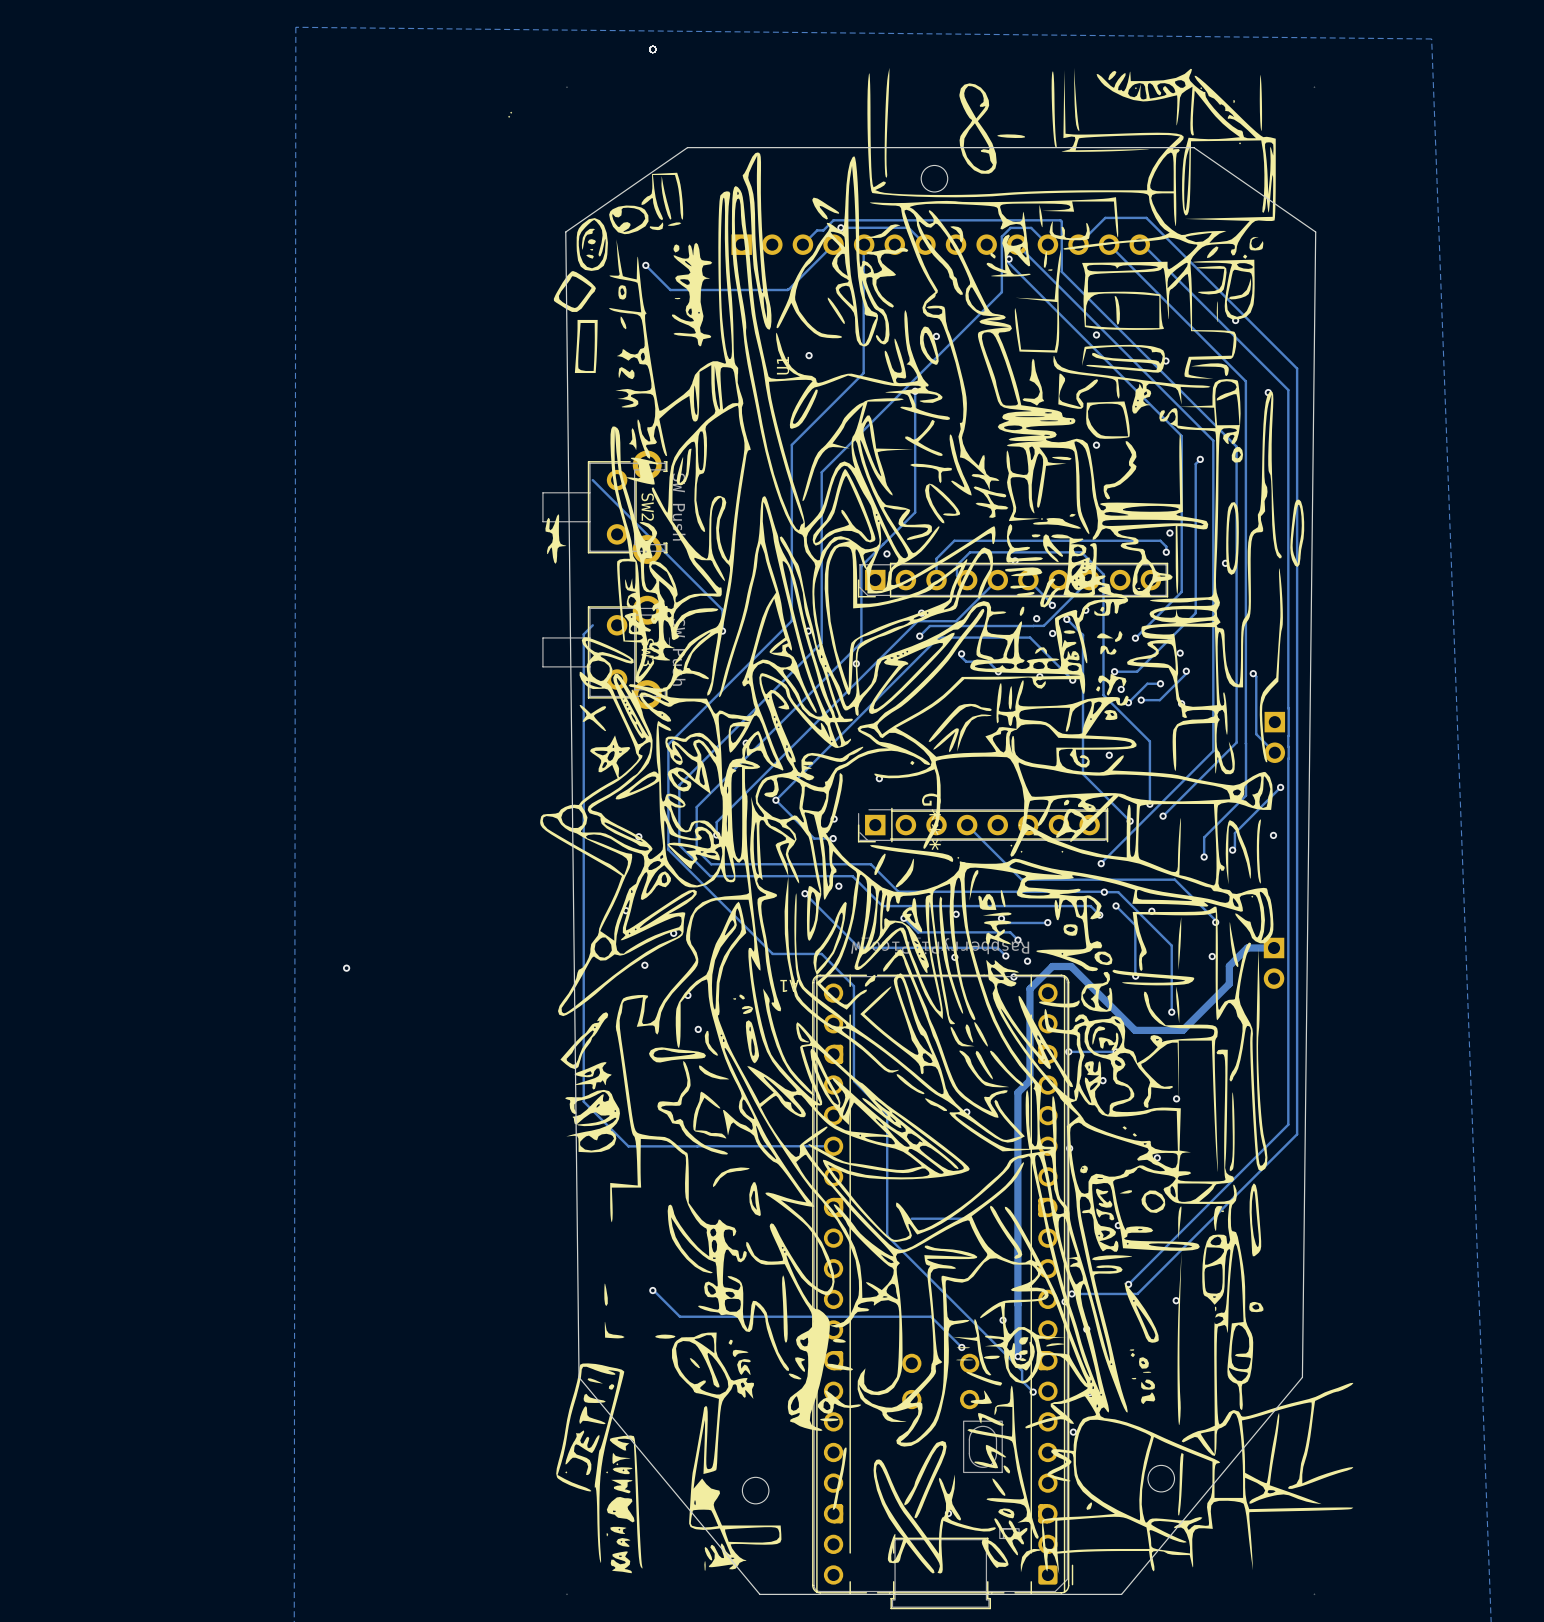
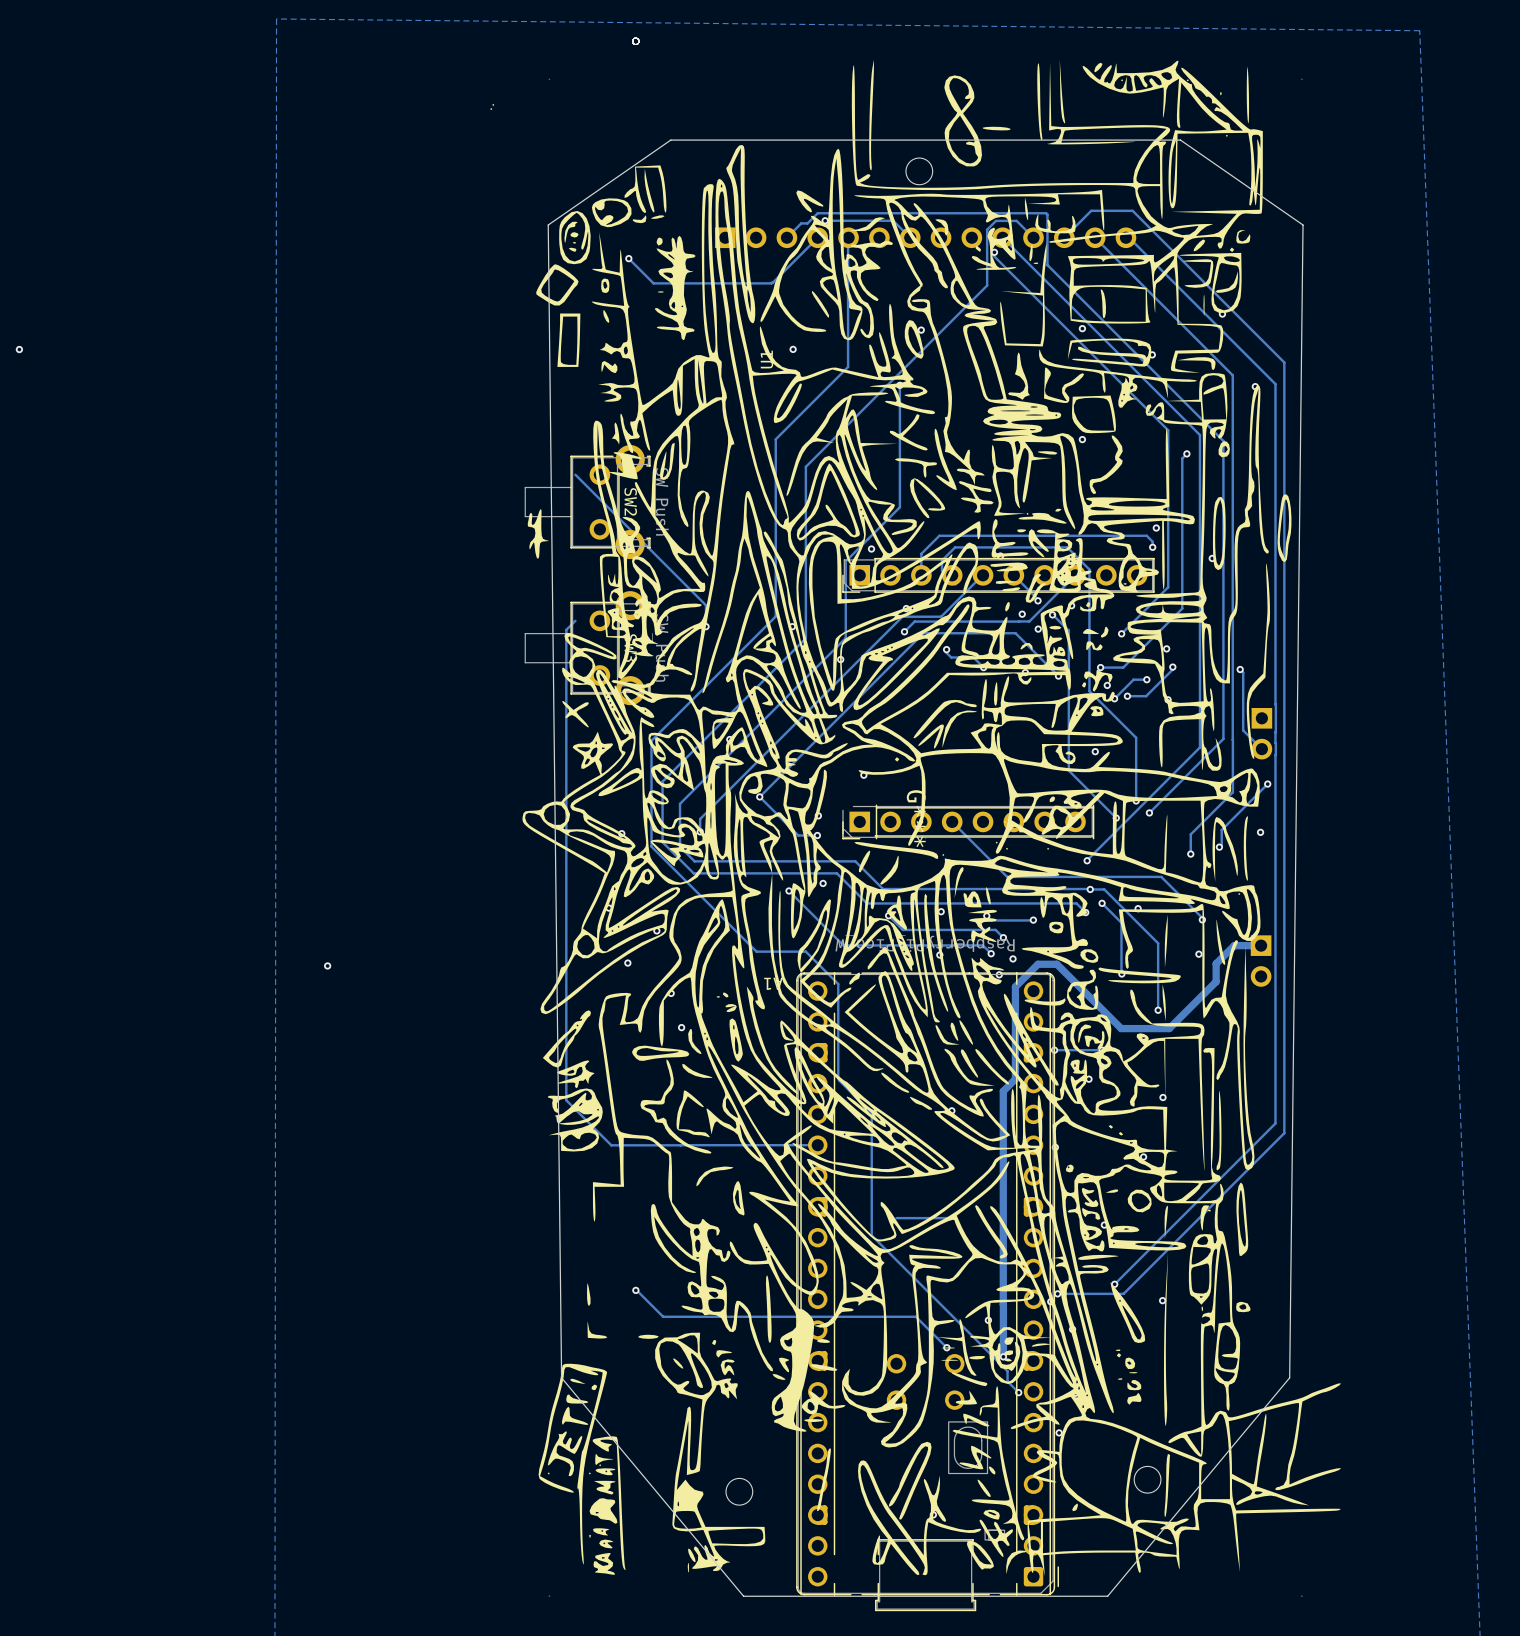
via: none -> (19, 349)

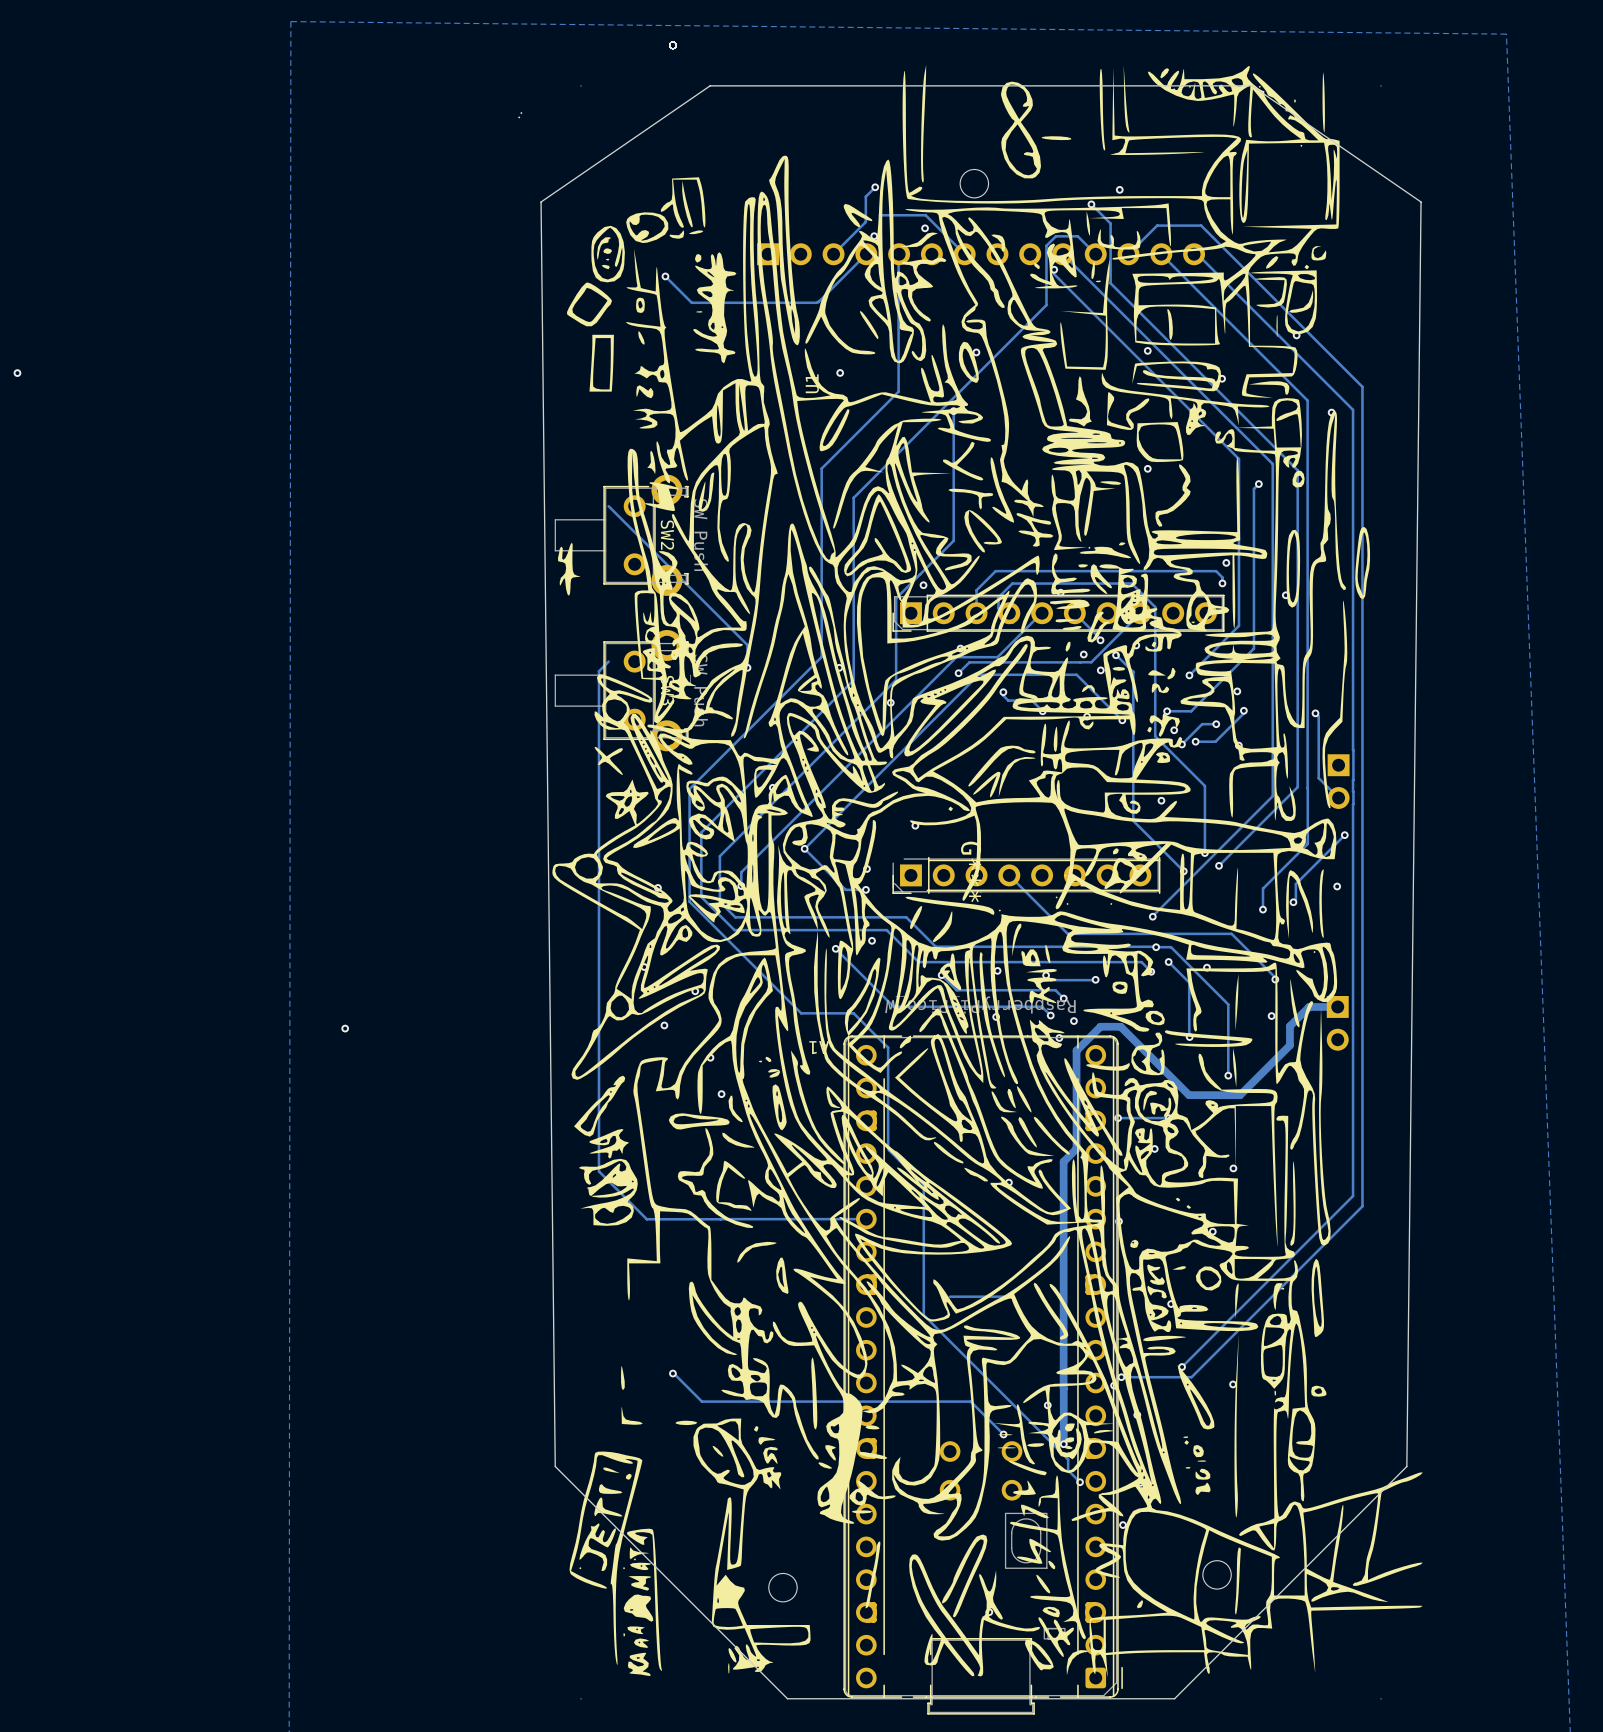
via: none -> (875, 187)
via: none -> (1119, 189)
track: none -> (1091, 204) (1110, 223) (1110, 229)
via: none -> (1091, 204)
via: none -> (925, 228)
track: (1047, 214) (817, 213) (807, 223) (801, 223) -> (875, 187) (865, 196) (865, 222) (848, 239)
track: (893, 220) (825, 220) -> (946, 236) (925, 215) (879, 215)
board edge: (1107, 1596) (1289, 1377) (1303, 225) (1180, 140) (670, 140) (548, 225) (561, 1377) (743, 1596) -> (1174, 1698) (1406, 1466) (1421, 202) (1252, 85) (710, 85) (541, 202) (555, 1466) (787, 1698)

